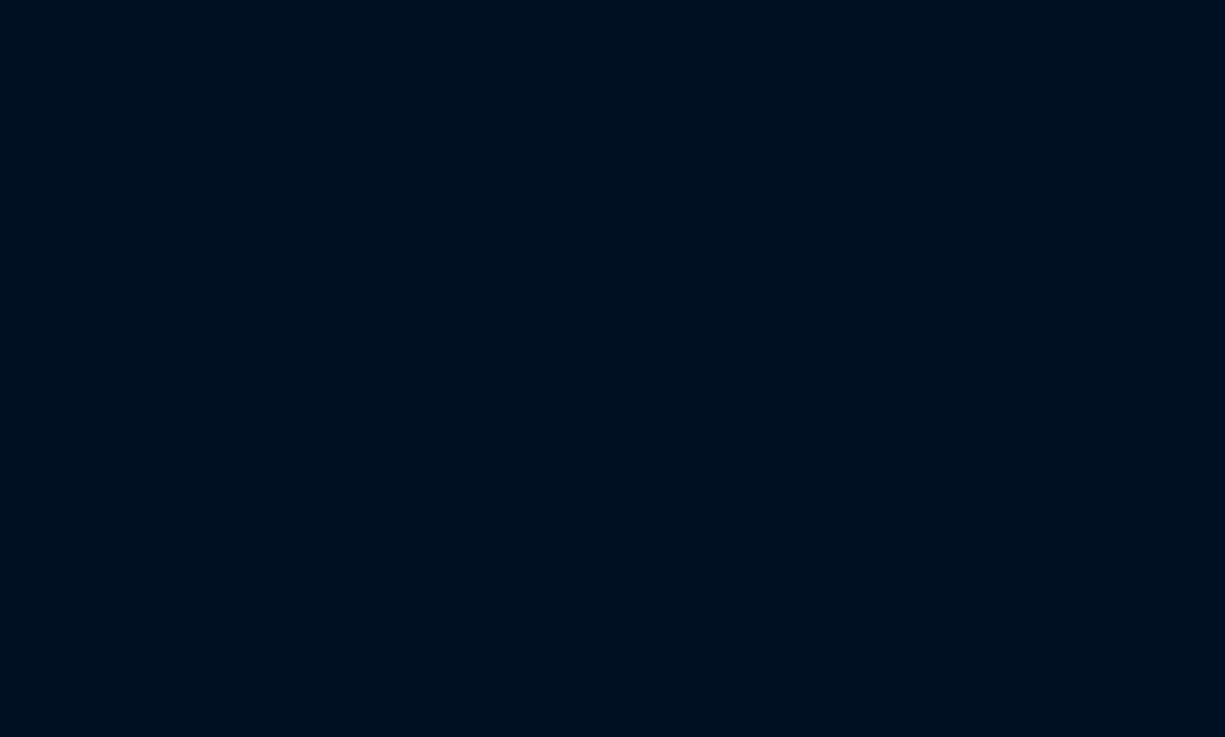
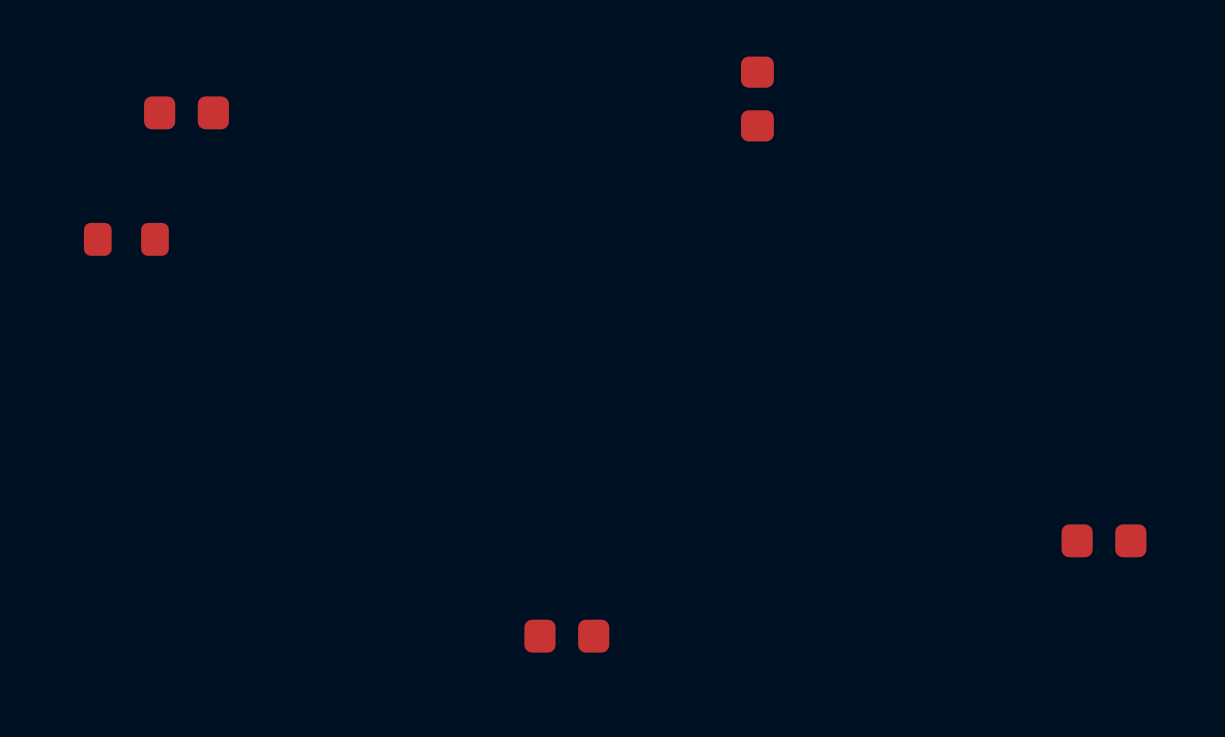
part: none -> (757, 99)
part: none -> (186, 112)
part: none -> (126, 239)
part: none -> (1103, 540)
part: none -> (566, 636)

